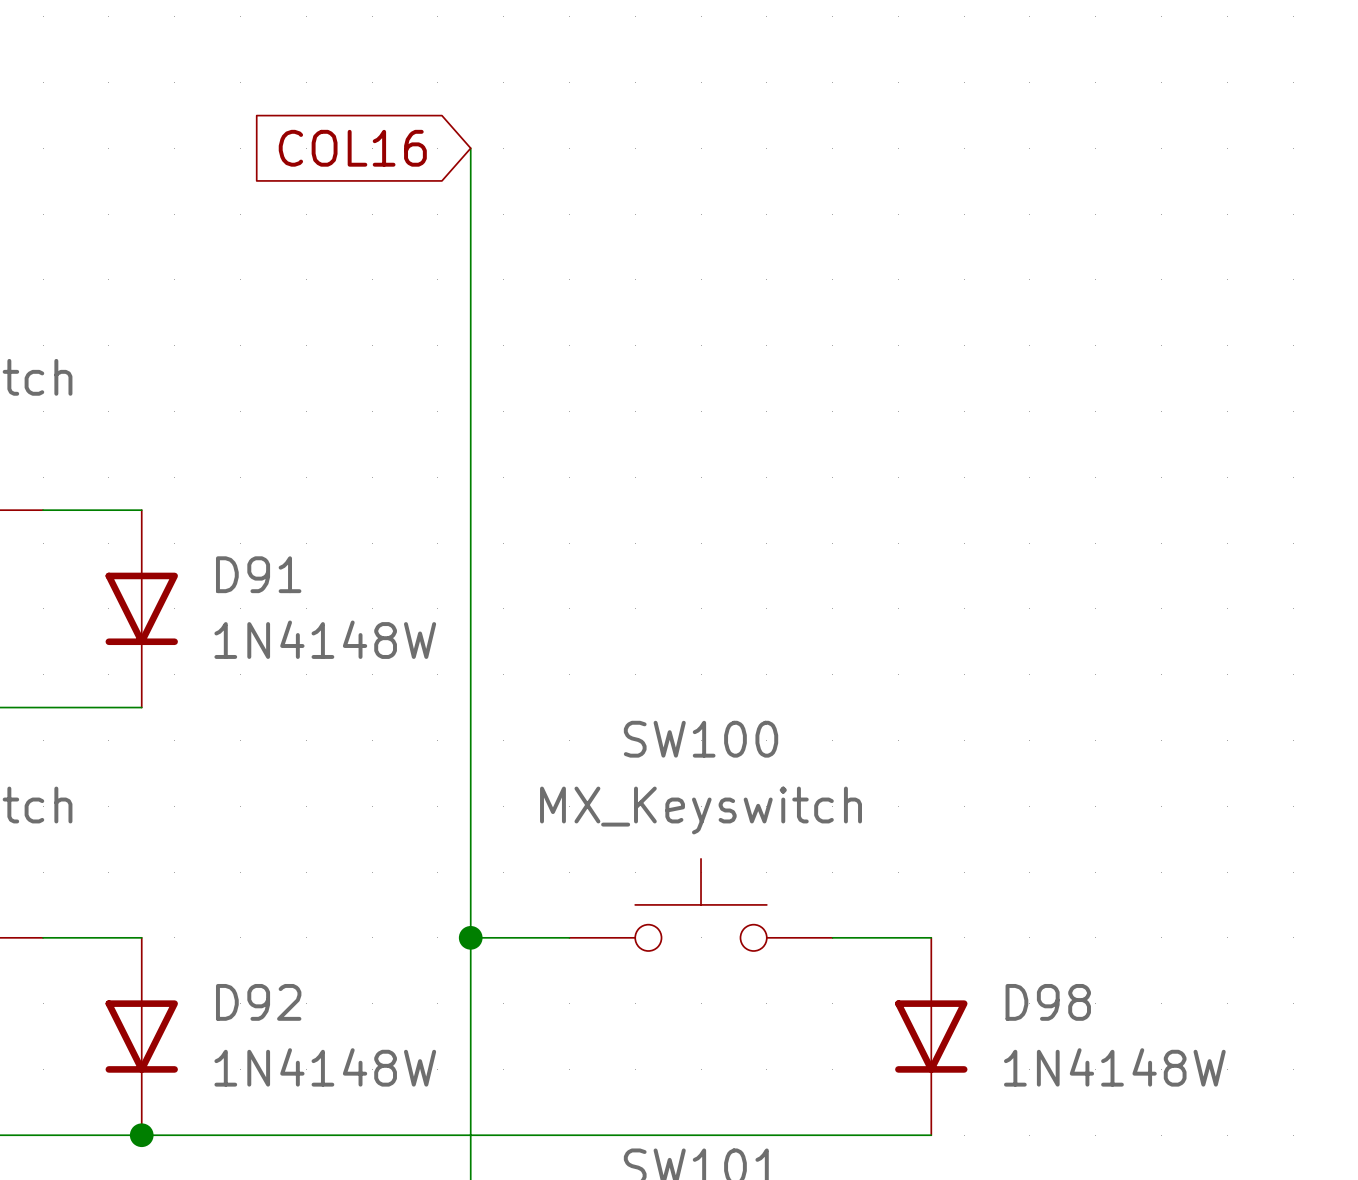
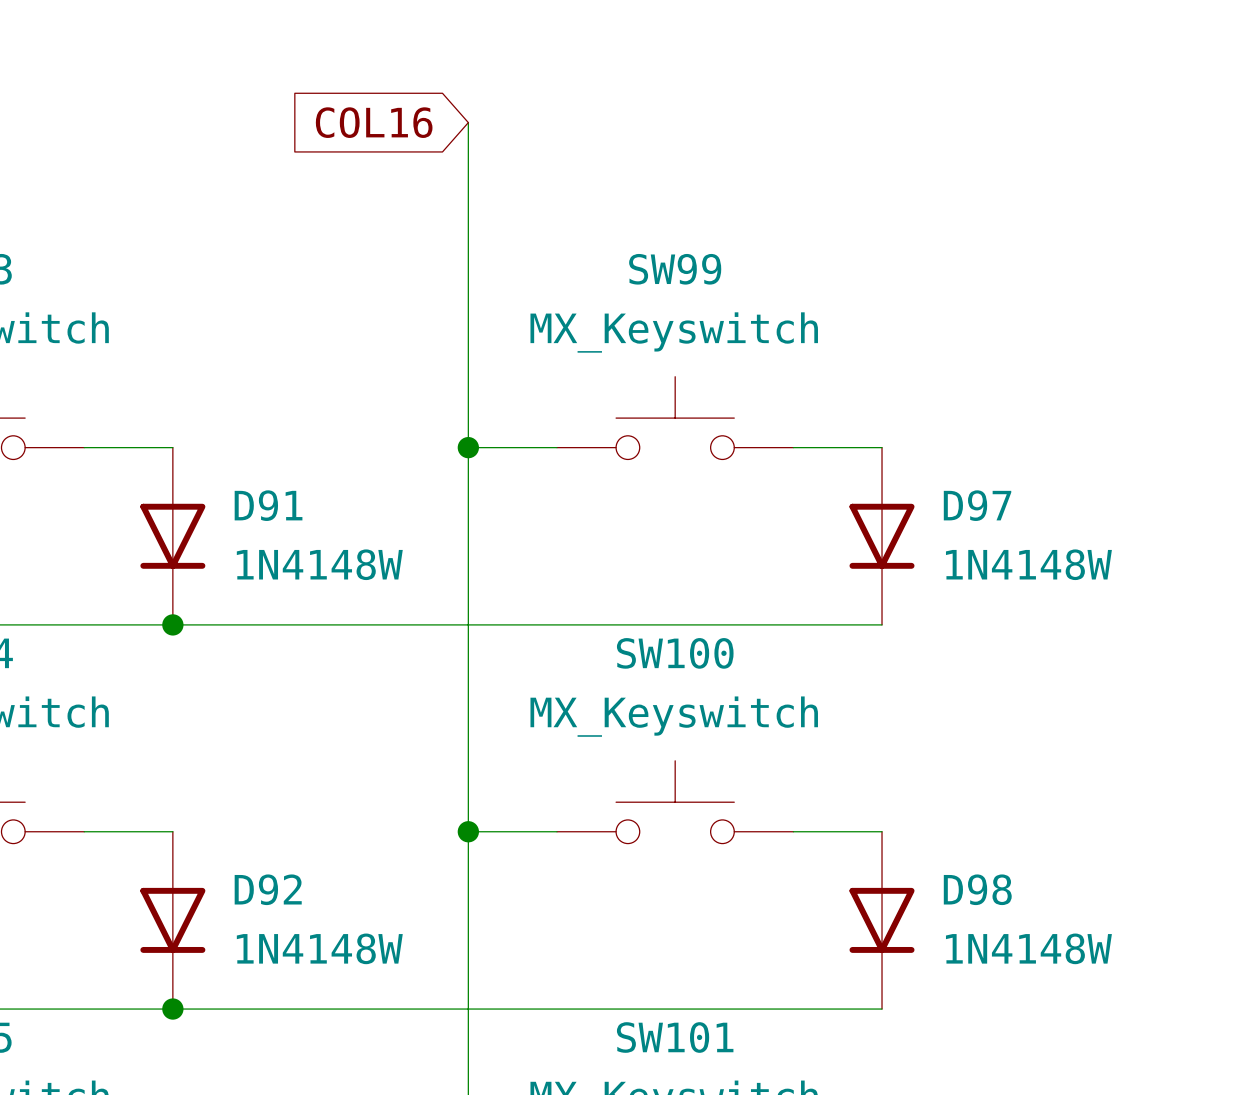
SW99: none -> MX_Keyswitch (675, 418)
wire: none -> (468, 447) (556, 447)
junction: none -> (468, 447)
wire: none -> (793, 447) (882, 447)
D97: none -> 1N4148W (882, 536)
wire: none -> (172, 624) (882, 624)
junction: none -> (172, 624)

